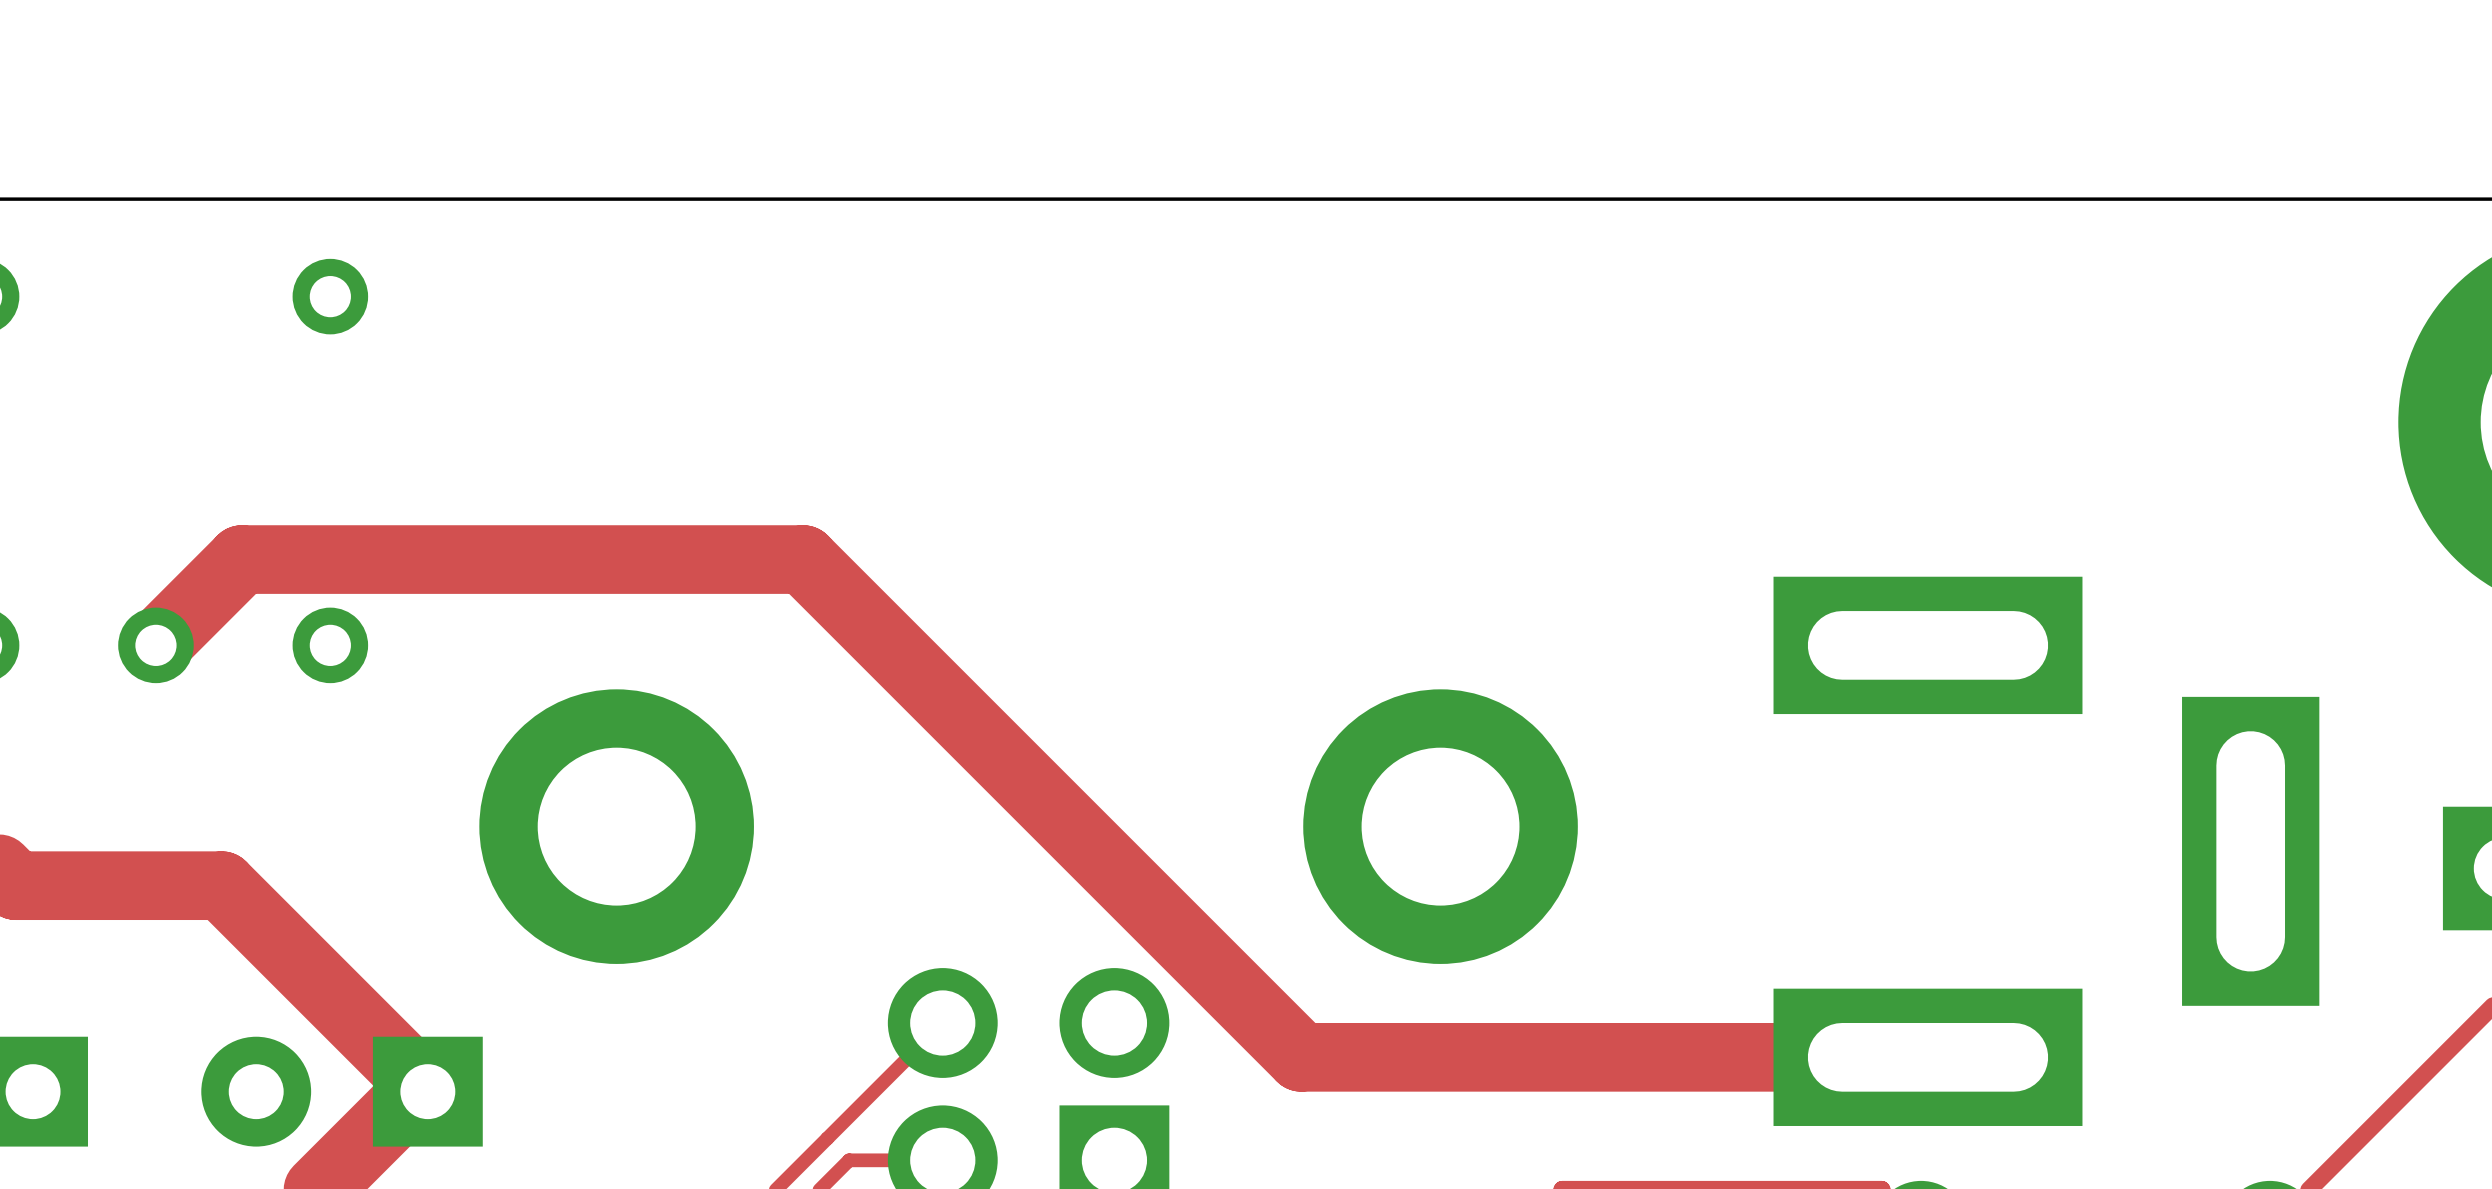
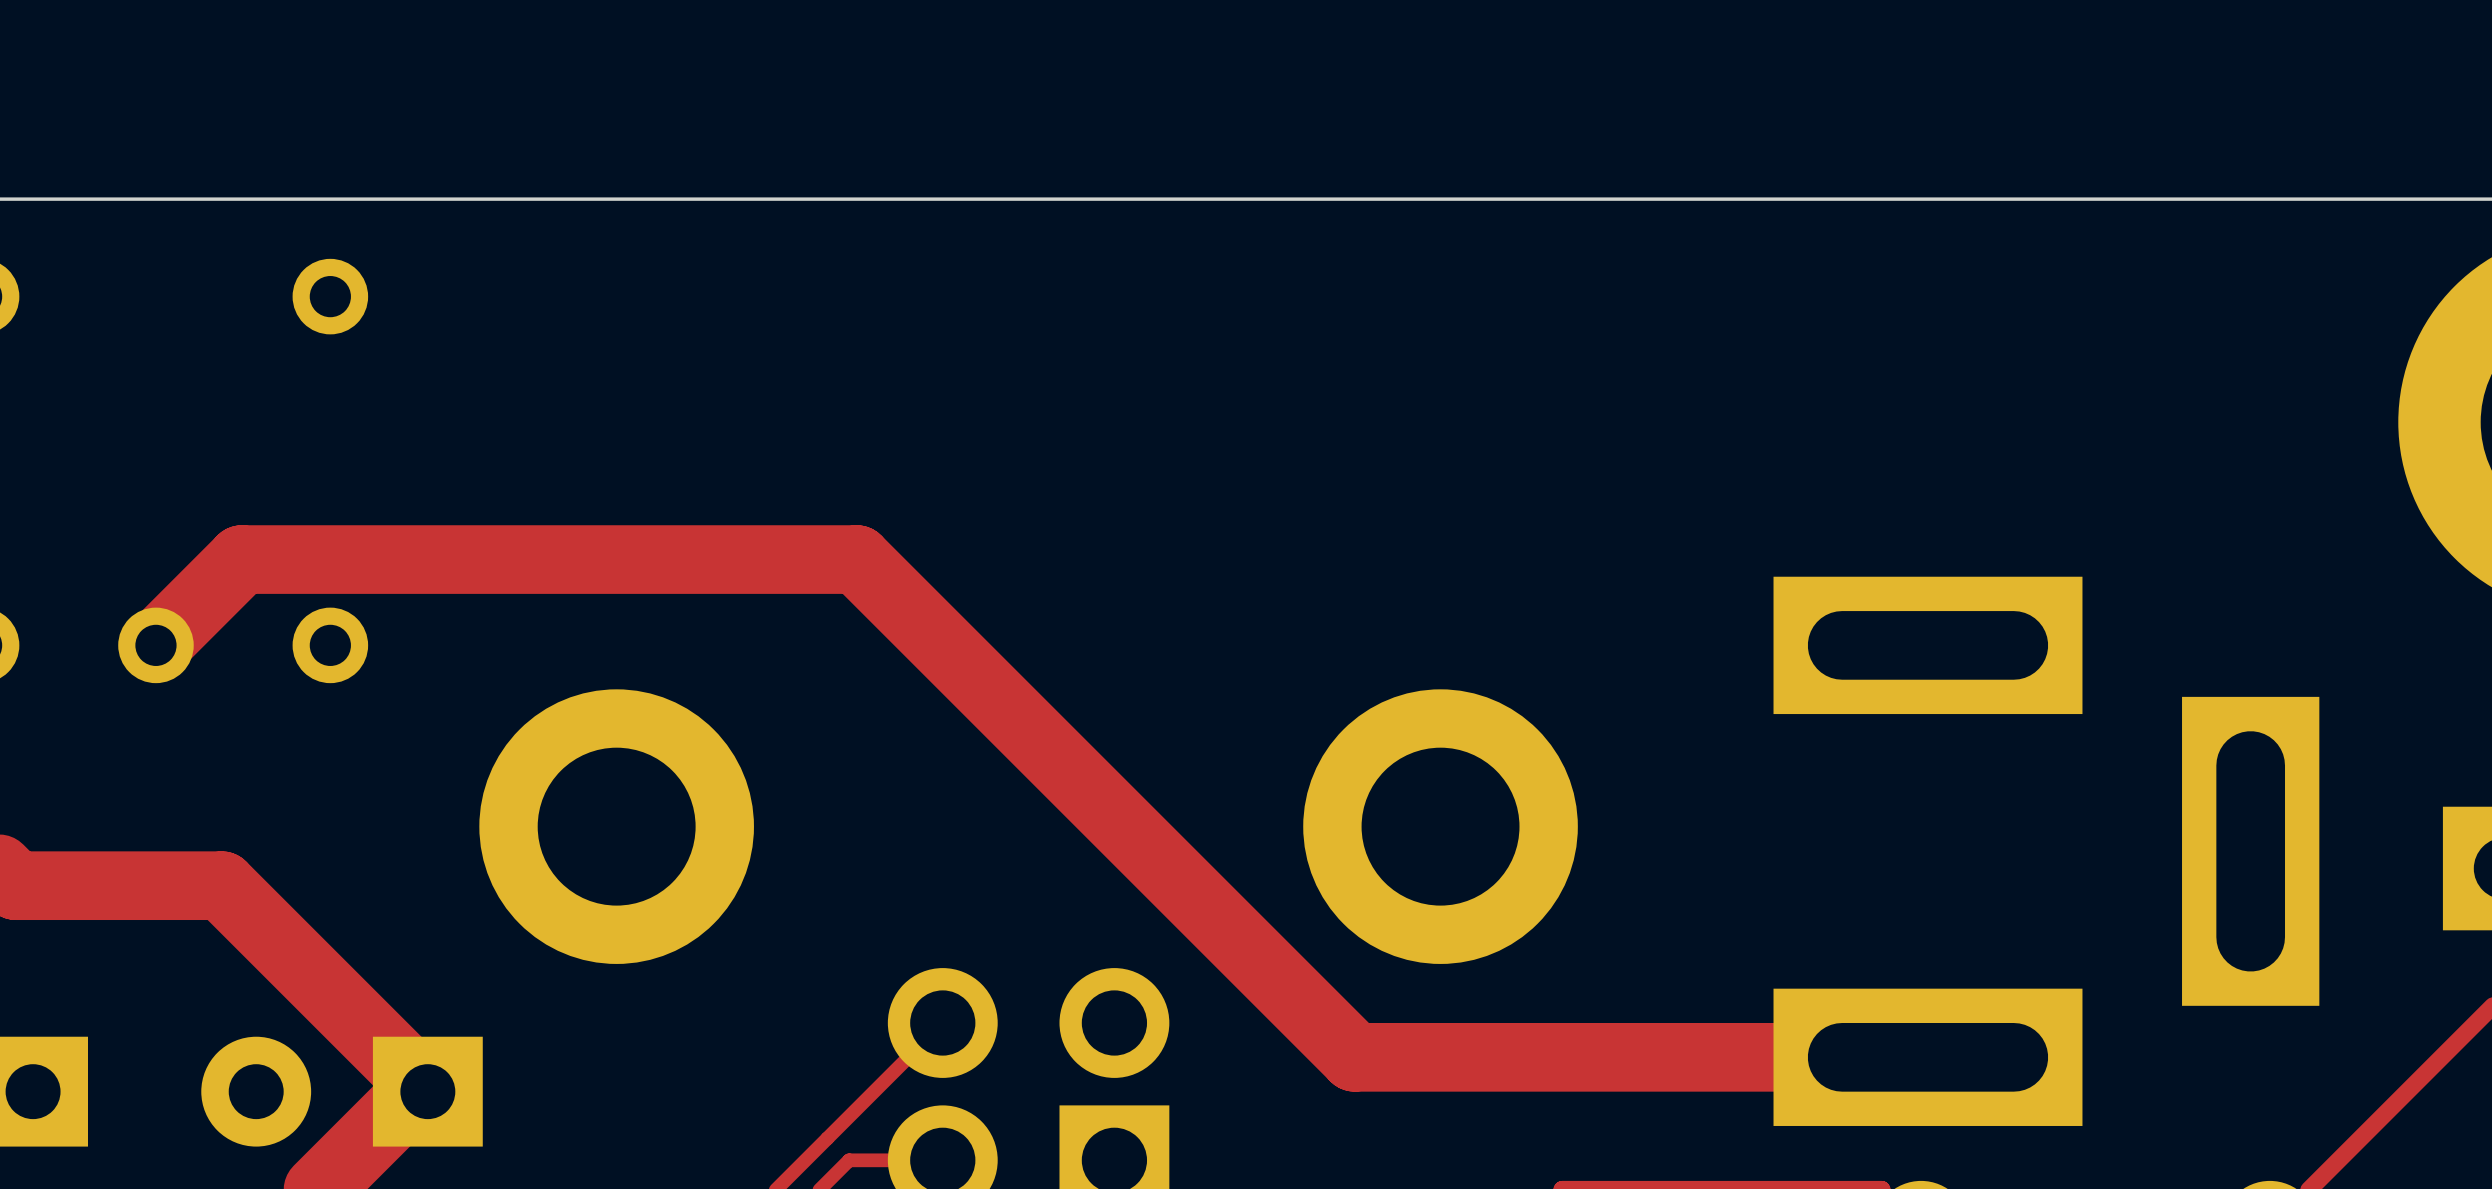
top track: (803, 559) (1301, 1057) (1354, 1057) -> (803, 559) (856, 559) (1354, 1057)

